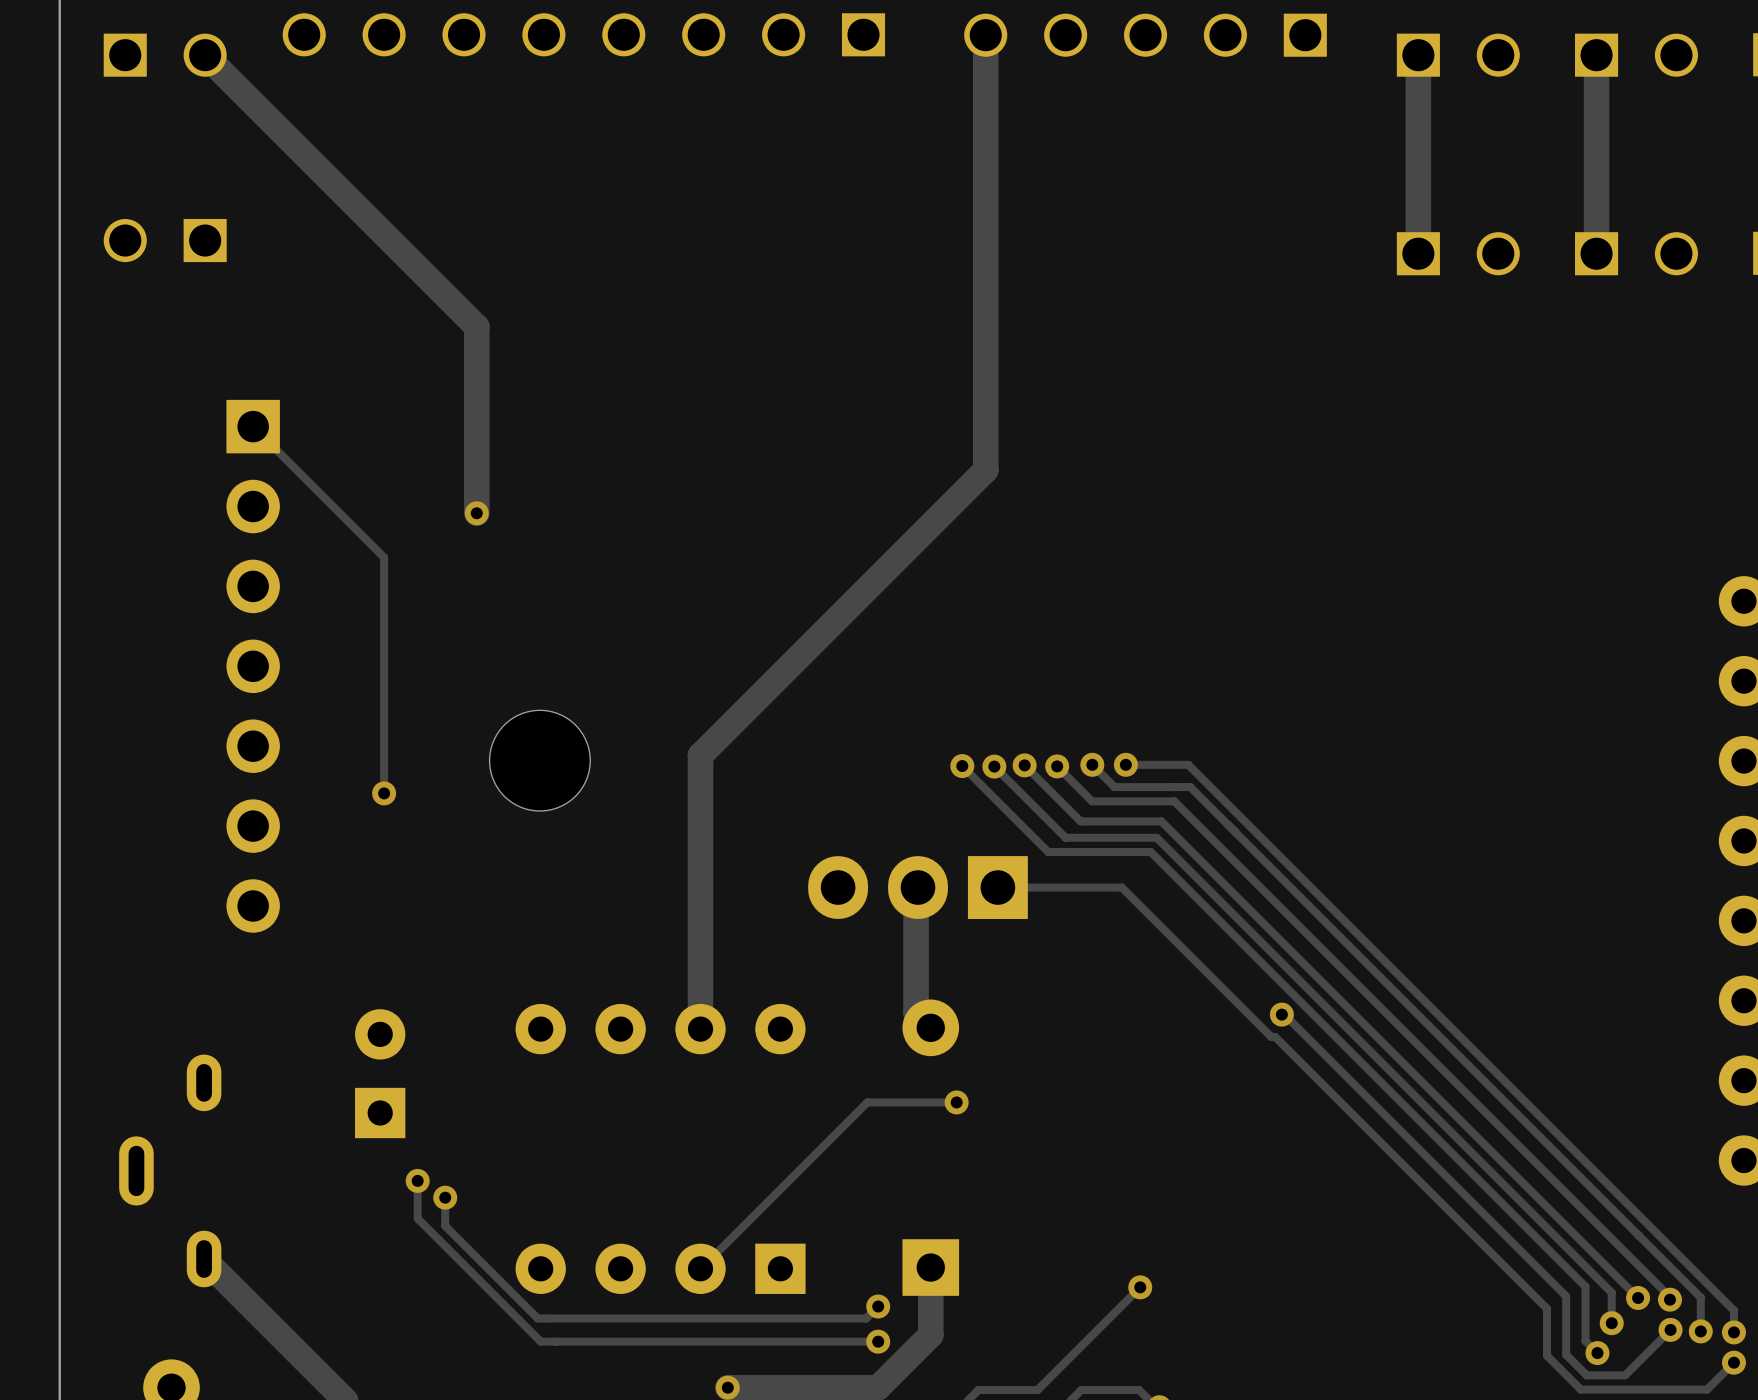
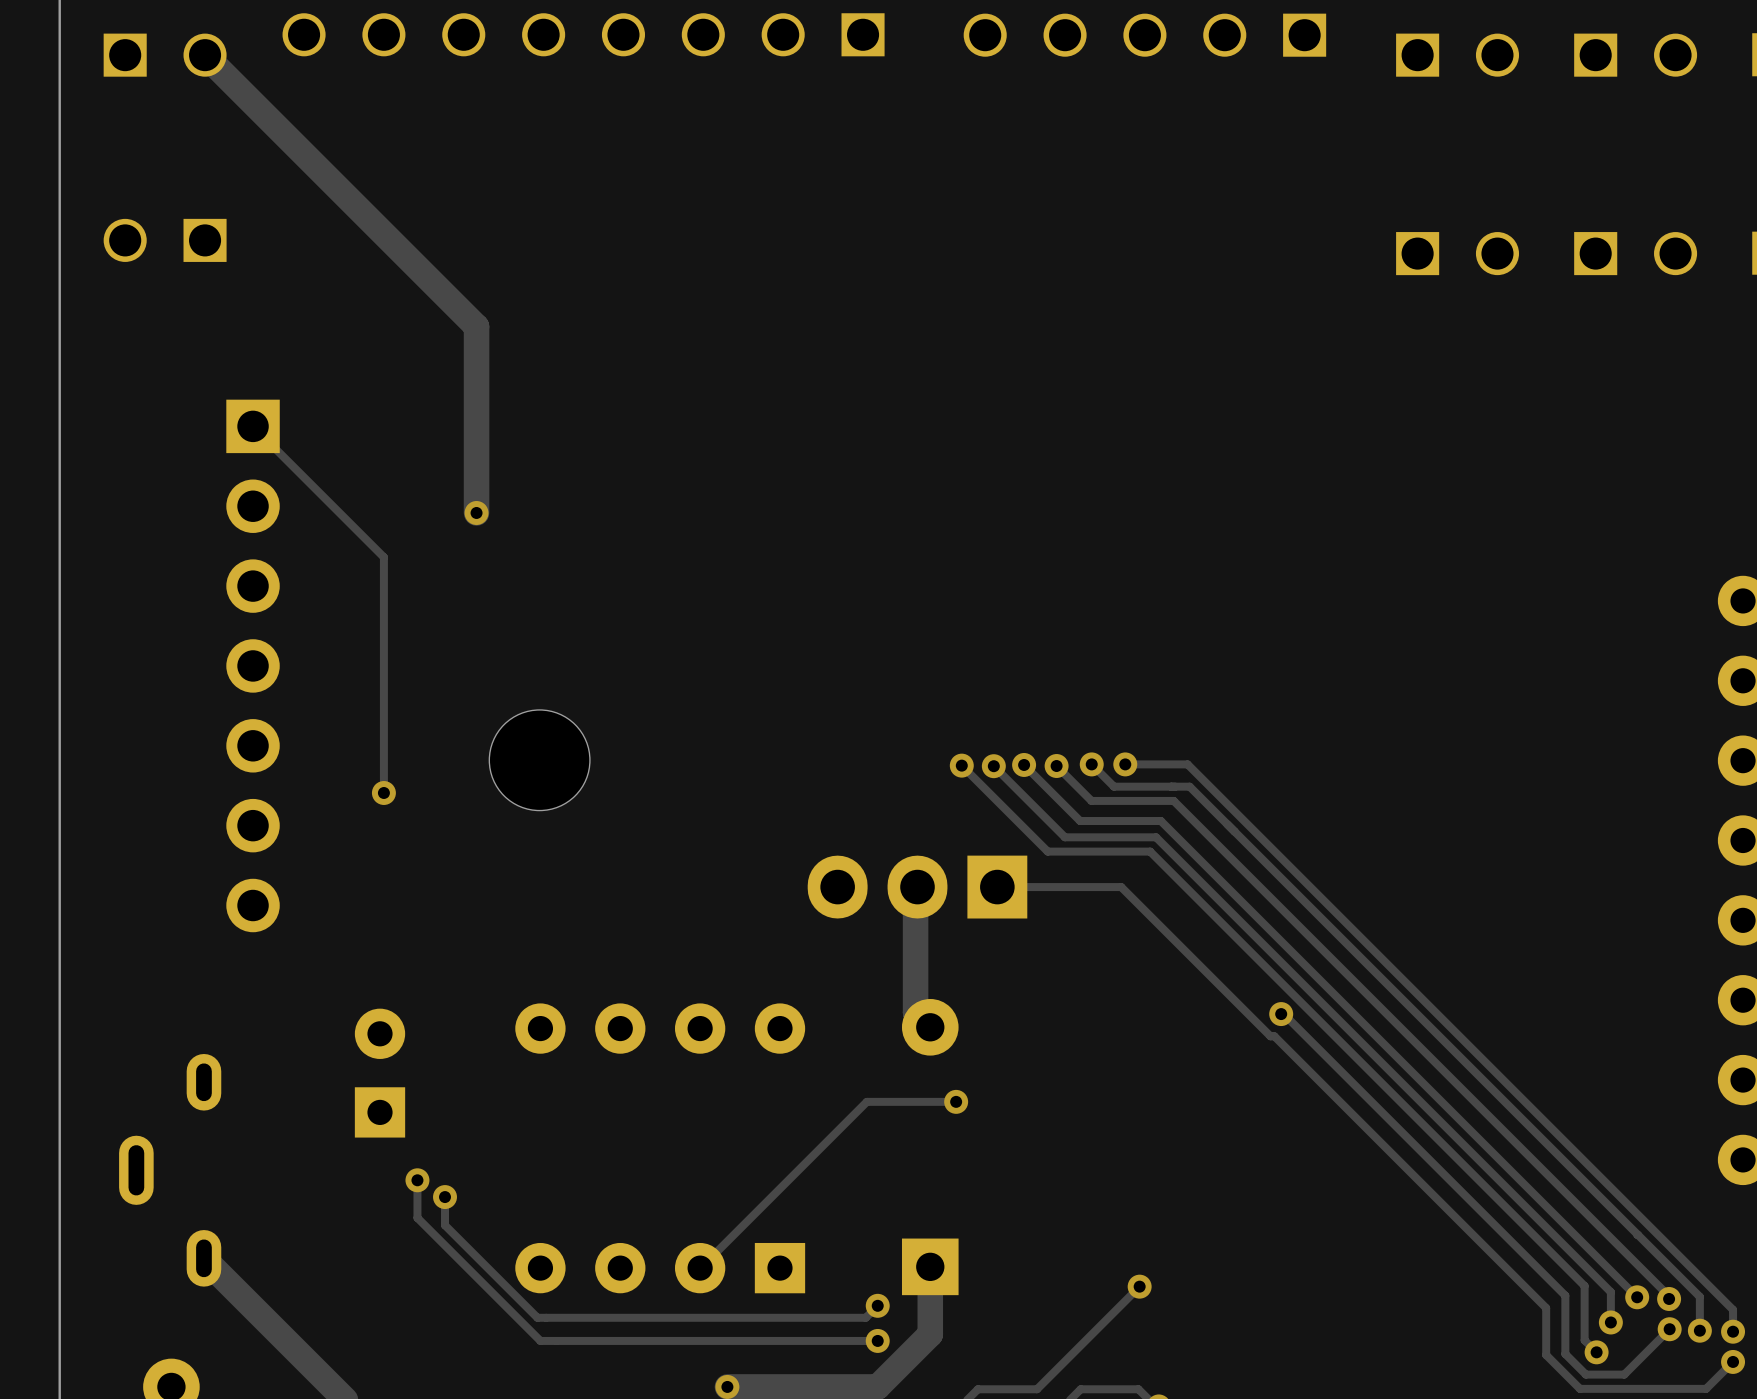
track: (985, 35) (985, 470) (700, 755) (700, 1029) -> none
track: (1418, 55) (1418, 253) -> none
track: (1596, 55) (1596, 253) -> none

